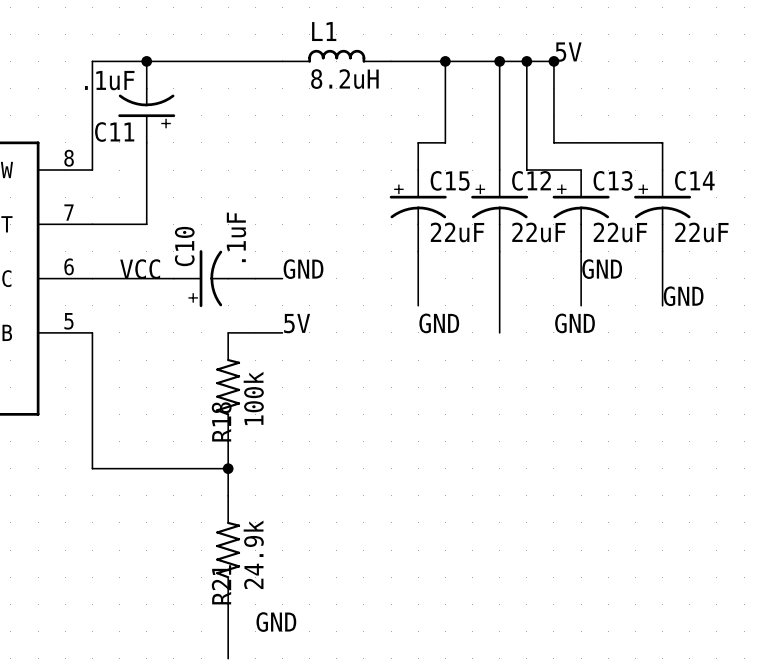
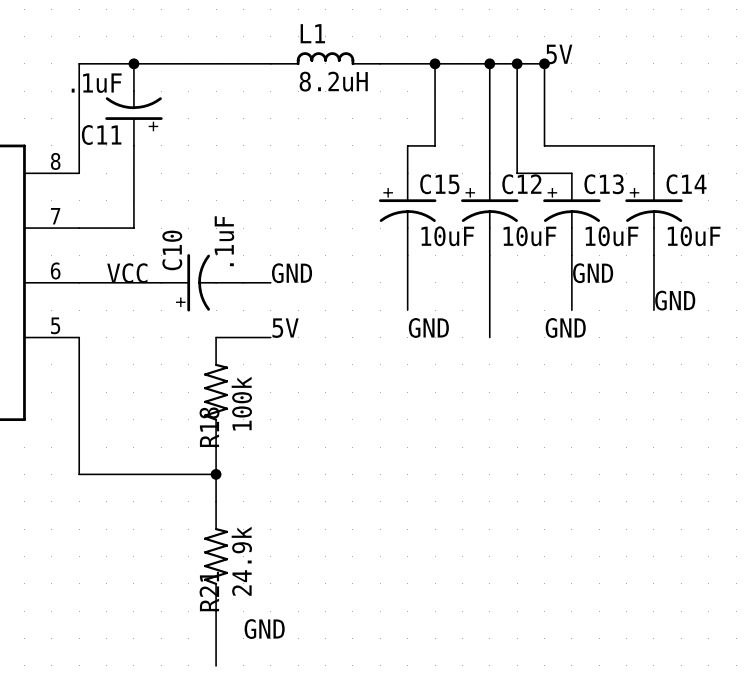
C15 value: 22uF (457, 232) -> 10uF (447, 236)
C12 value: 22uF (538, 232) -> 10uF (529, 236)
C13 value: 22uF (620, 232) -> 10uF (612, 236)
C14 value: 22uF (701, 232) -> 10uF (694, 236)

